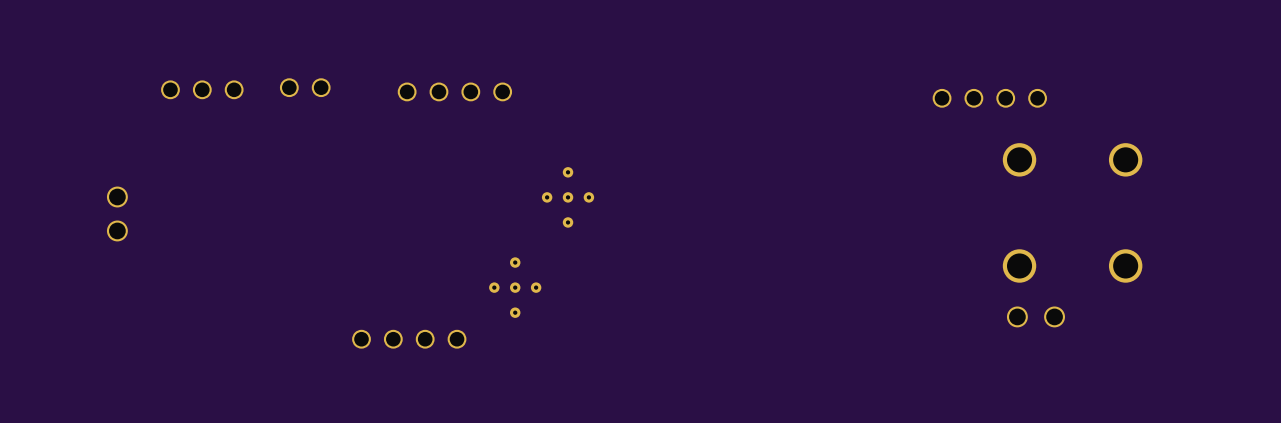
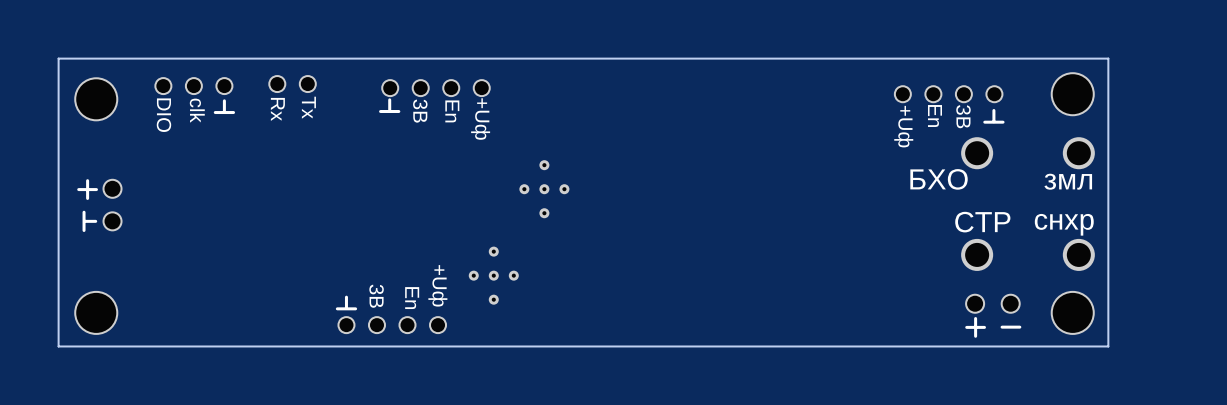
board edge: none -> (1108, 58) (58, 58) (58, 346) (1108, 346) (1108, 58)
part: none -> (1072, 94)
part: none -> (96, 99)
line: none -> (389, 99) (389, 110)
line: none -> (224, 100) (224, 112)
text: none -> Tx (308, 107)
line: none -> (993, 110) (993, 121)
text: none -> Rx (277, 109)
line: none -> (398, 111) (380, 111)
line: none -> (233, 112) (215, 112)
text: none -> En (452, 111)
text: none -> 3В (420, 111)
text: none -> clk (197, 110)
text: none -> DIO (163, 115)
text: none -> En (934, 116)
text: none -> 3В (963, 116)
line: none -> (1003, 122) (984, 122)
text: none -> +Uф (480, 119)
text: none -> +Uф (903, 126)
text: none -> БXО (939, 179)
line: none -> (87, 180) (87, 198)
text: none -> змл (1068, 181)
line: none -> (96, 189) (78, 189)
line: none -> (84, 212) (84, 230)
line: none -> (95, 221) (84, 221)
text: none -> СТР (982, 222)
text: none -> снхр (1064, 224)
text: none -> +Uф (437, 285)
line: none -> (346, 297) (346, 308)
text: none -> 3В (376, 296)
text: none -> En (412, 298)
line: none -> (355, 308) (337, 308)
part: none -> (96, 312)
part: none -> (1072, 312)
line: none -> (975, 318) (975, 336)
line: none -> (984, 327) (966, 327)
line: none -> (1019, 327) (1002, 327)

